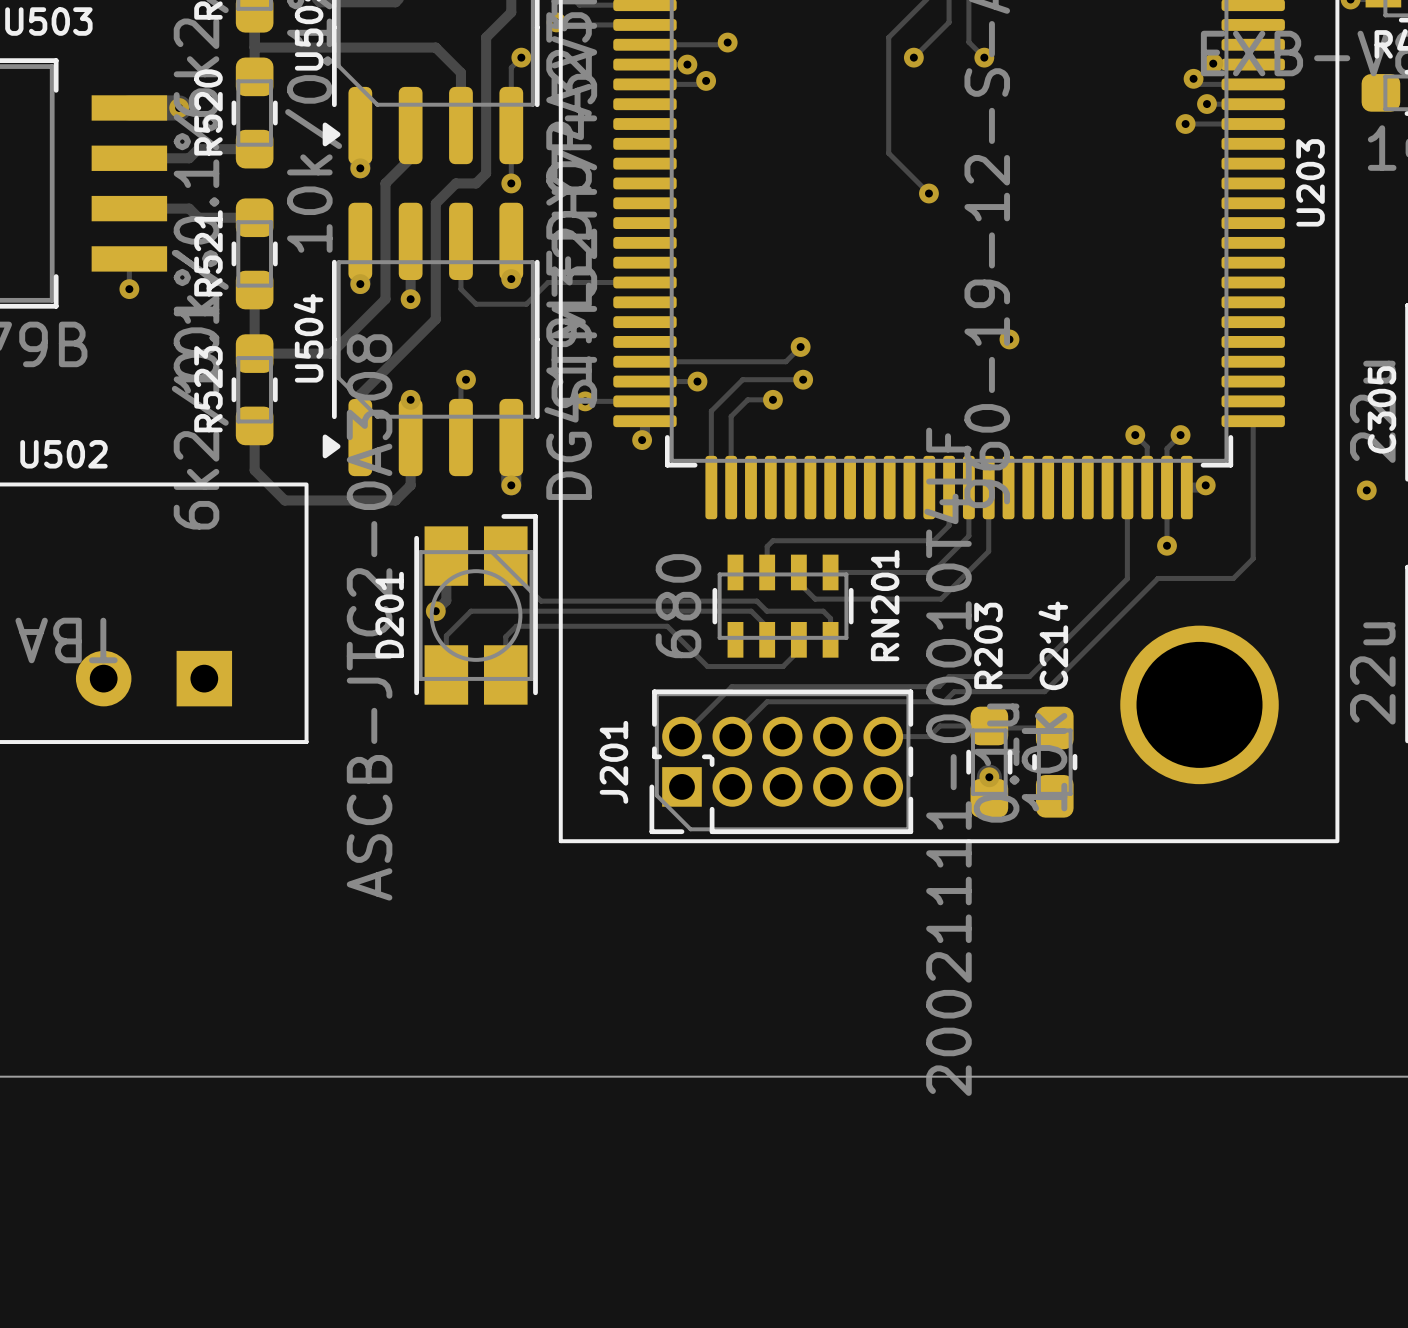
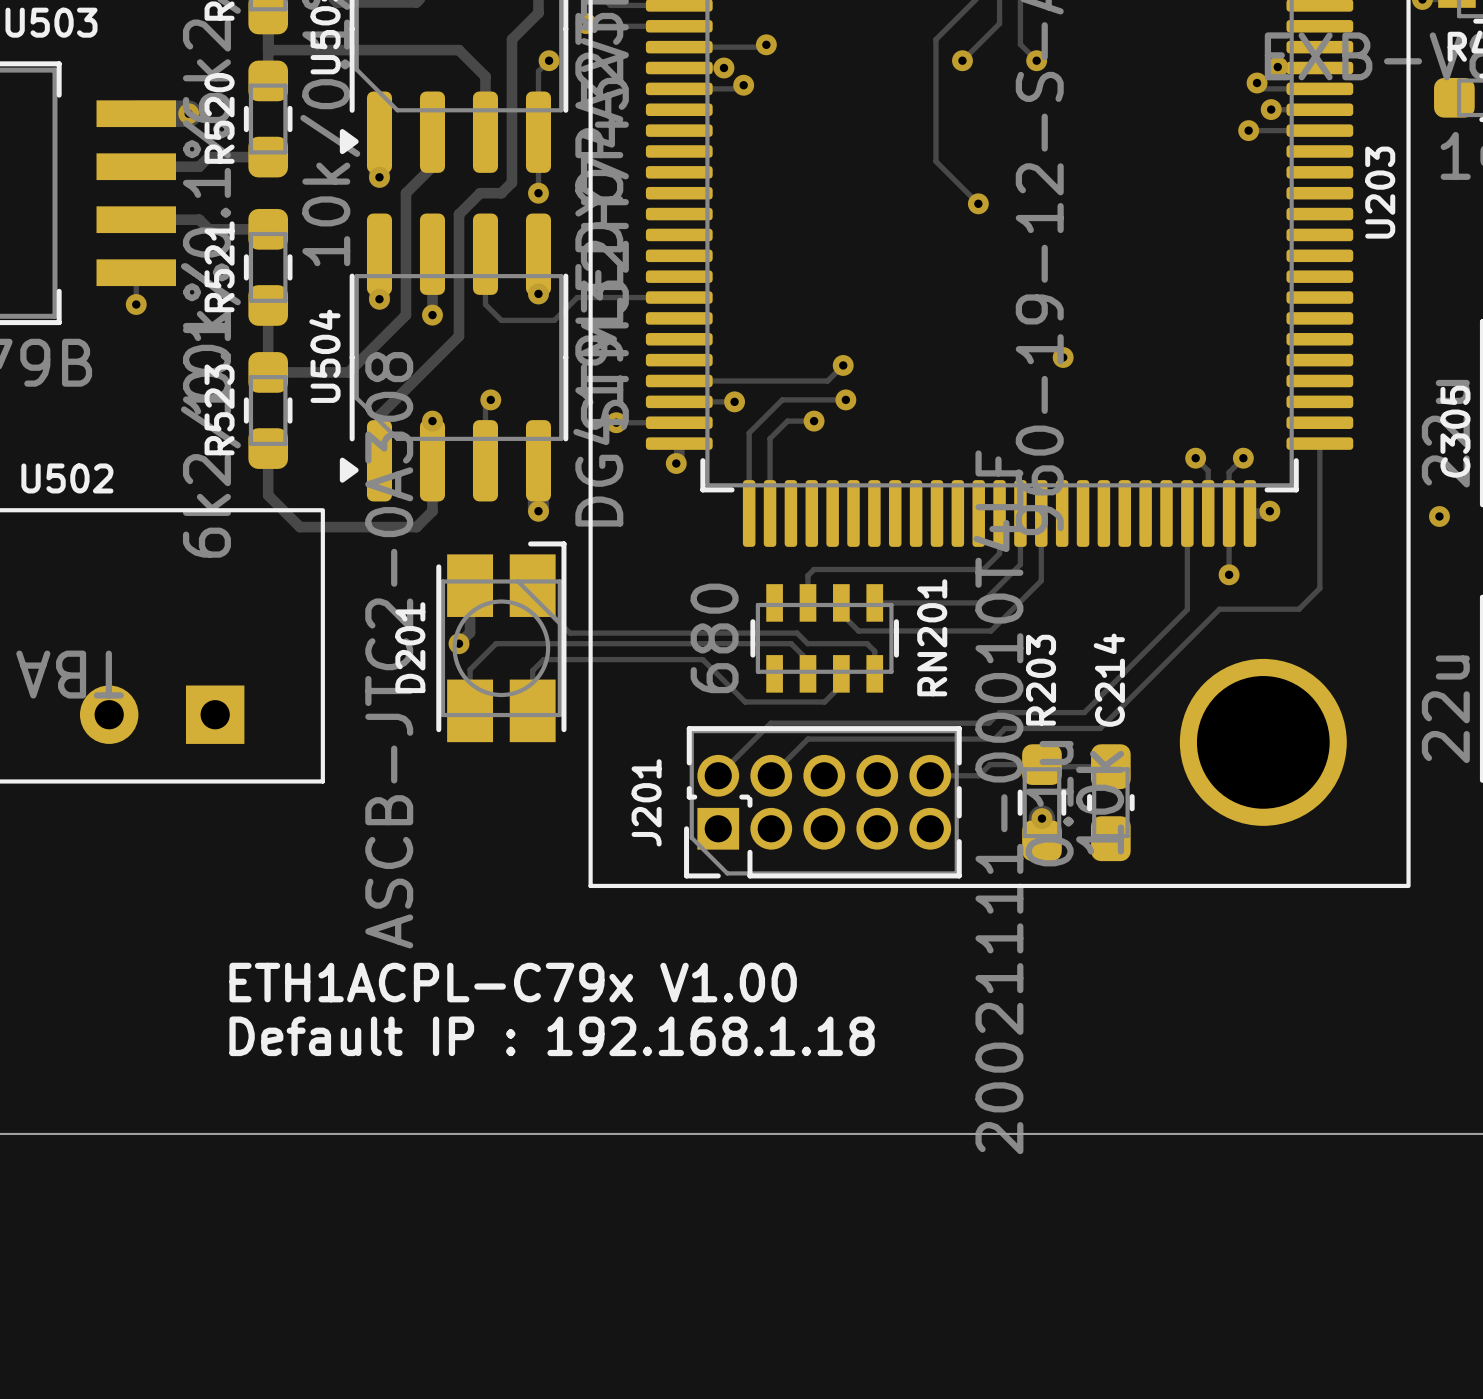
text: none -> ETH1ACPL-C79x V1.00 (513, 982)
text: none -> Default IP : 192.168.1.18 (552, 1036)

